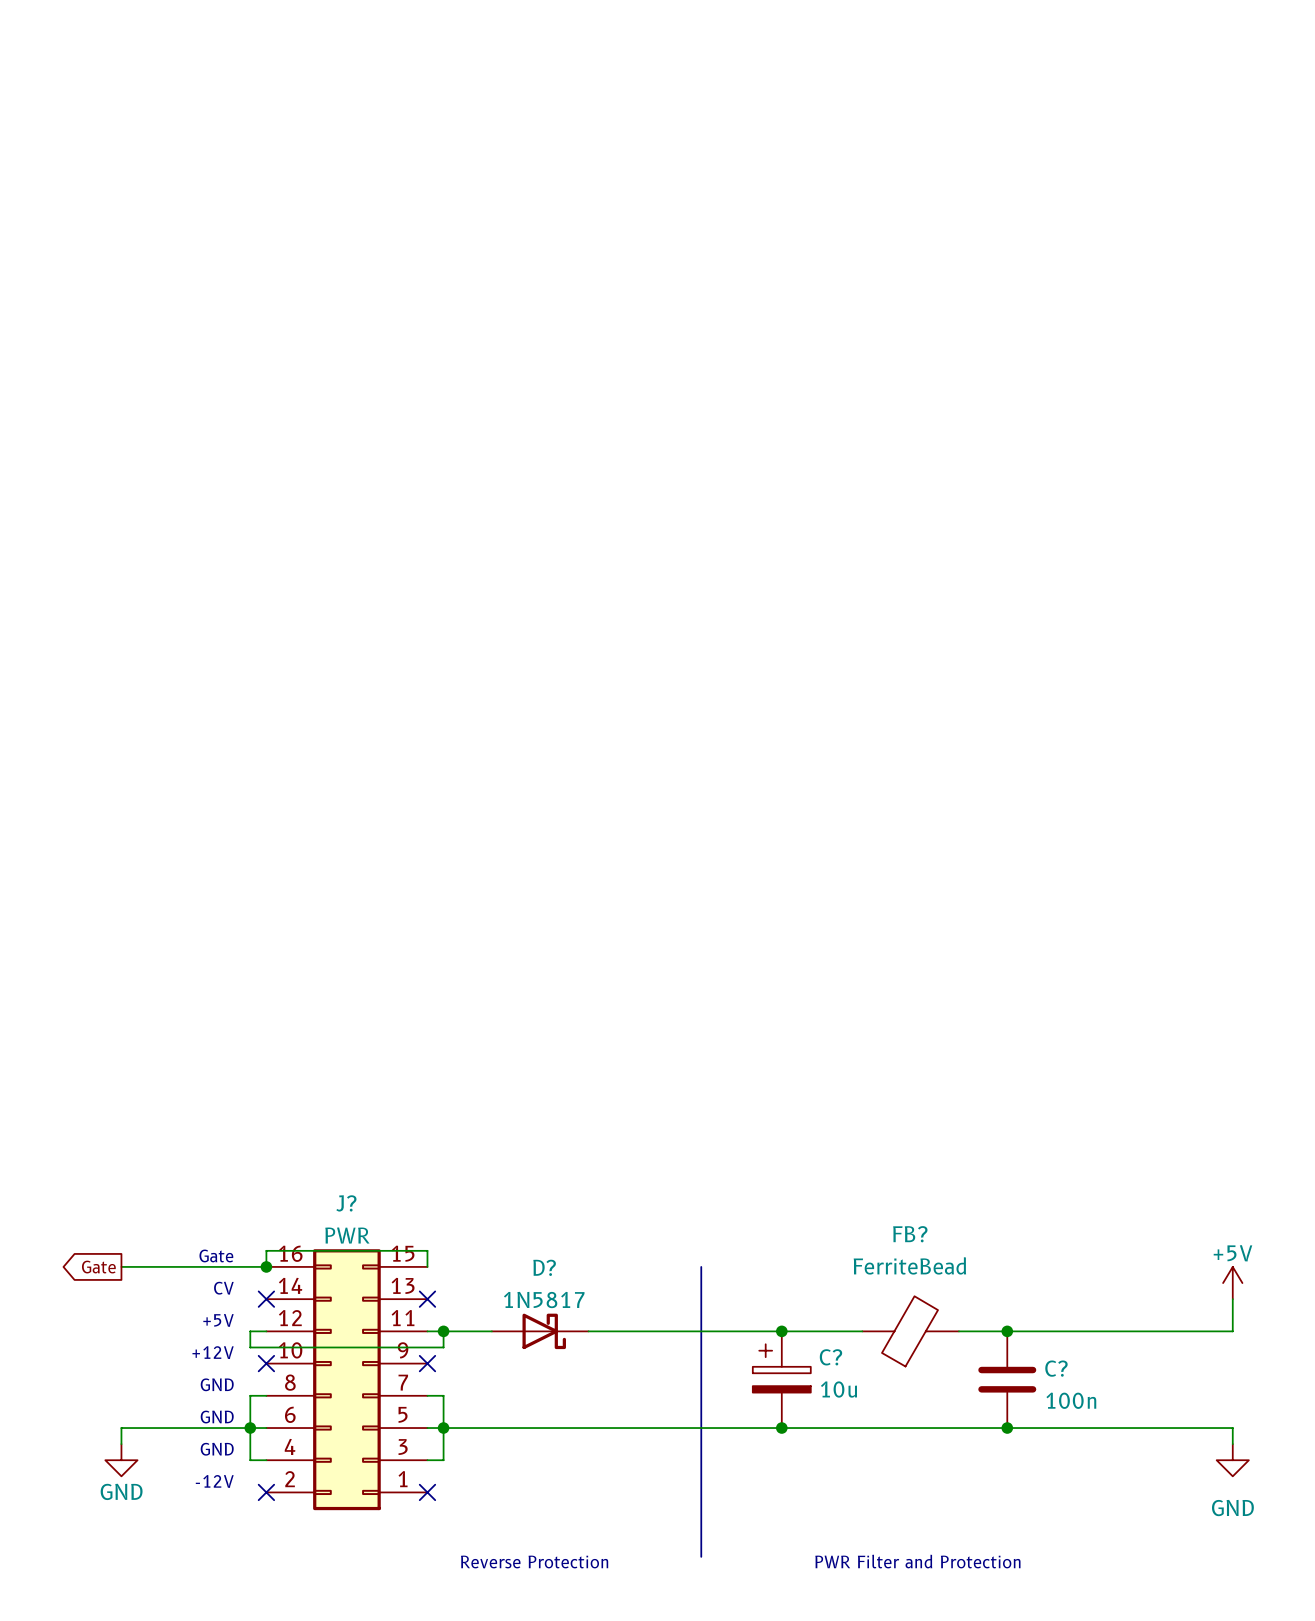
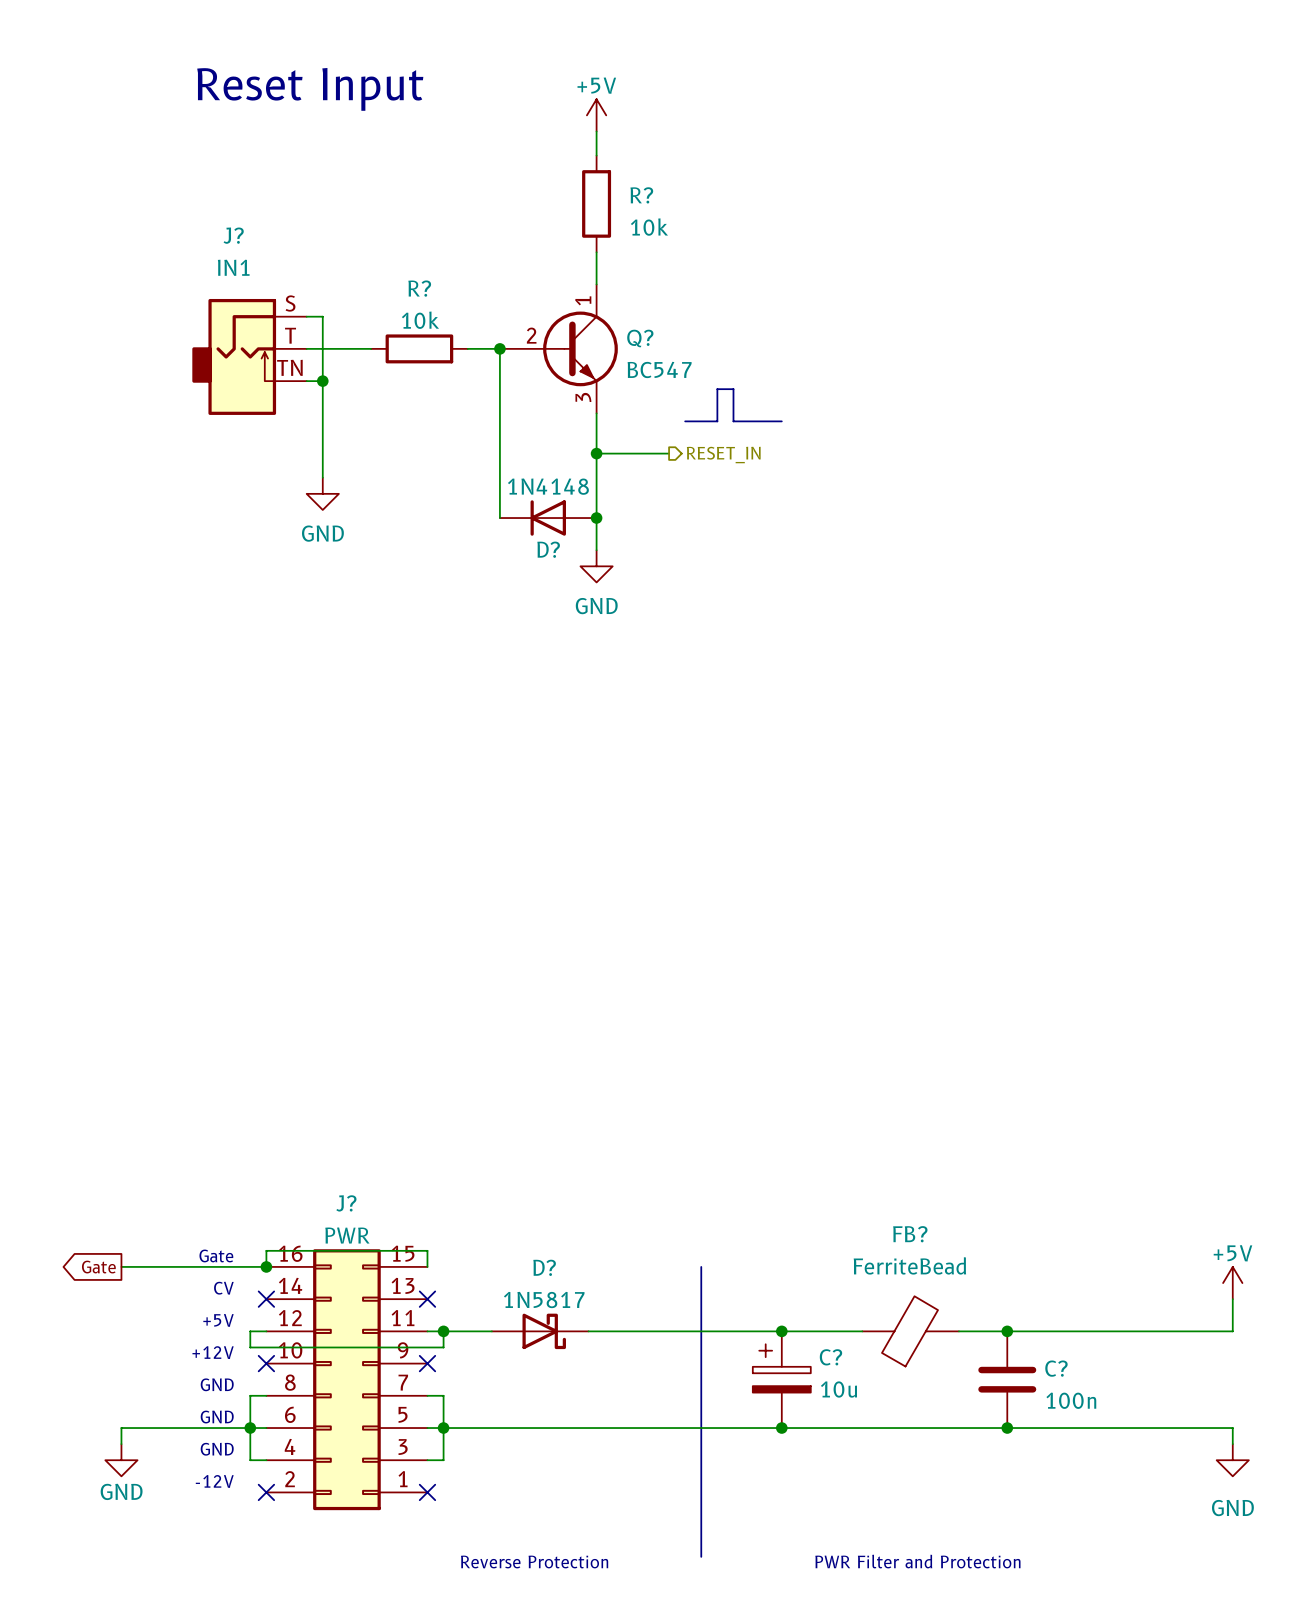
text: none -> Reset Input (310, 89)
power symbol: none -> +5V (596, 115)
wire: none -> (596, 131) (596, 155)
R?: none -> 10k (596, 203)
wire: none -> (596, 252) (596, 284)
wire: none -> (306, 316) (322, 316) (322, 477)
wire: none -> (306, 348) (371, 348)
R?: none -> 10k (419, 348)
wire: none -> (467, 348) (499, 348) (499, 518)
junction: none -> (499, 348)
Q?: none -> BC547 (558, 348)
J?: none -> IN1 (249, 356)
wire: none -> (306, 381) (322, 381)
junction: none -> (322, 381)
wire: none -> (596, 413) (596, 550)
line: none -> (685, 421) (717, 421) (717, 389) (733, 389) (733, 421) (781, 421)
wire: none -> (596, 453) (669, 453)
junction: none -> (596, 453)
hierarchical label: none -> RESET_IN (723, 455)
power symbol: none -> GND (322, 493)
D?: none -> 1N4148 (548, 518)
junction: none -> (596, 518)
power symbol: none -> GND (596, 566)

